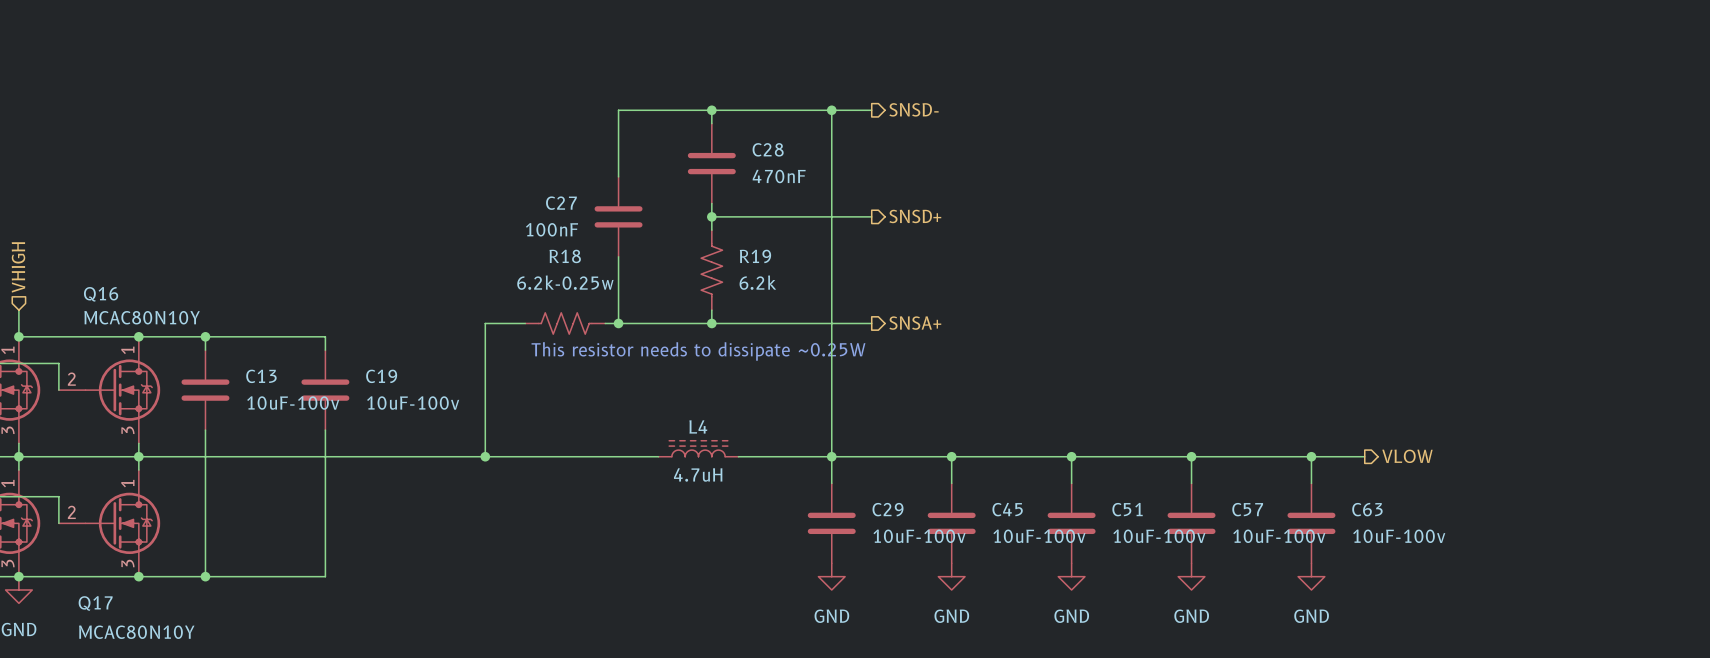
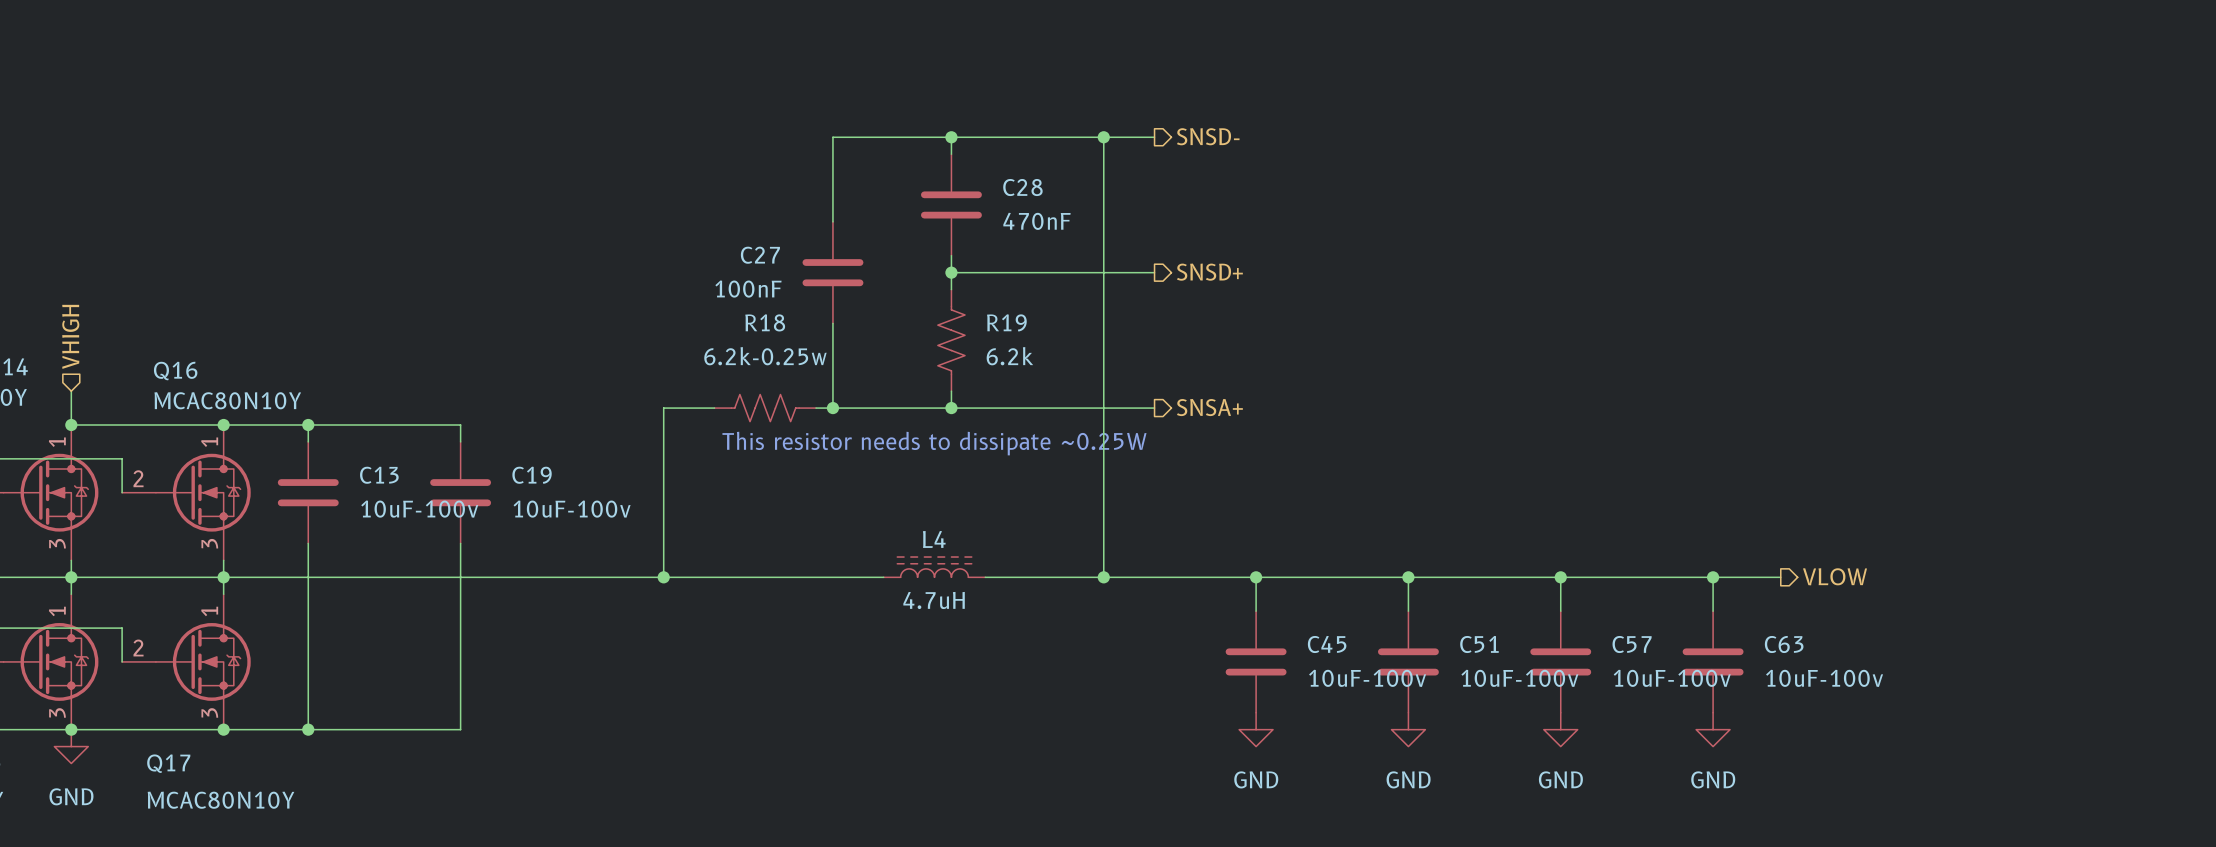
wire: (831, 456) (831, 483) -> none
C29: 10uF-100v (831, 523) -> none
power symbol: GND (831, 576) -> none

